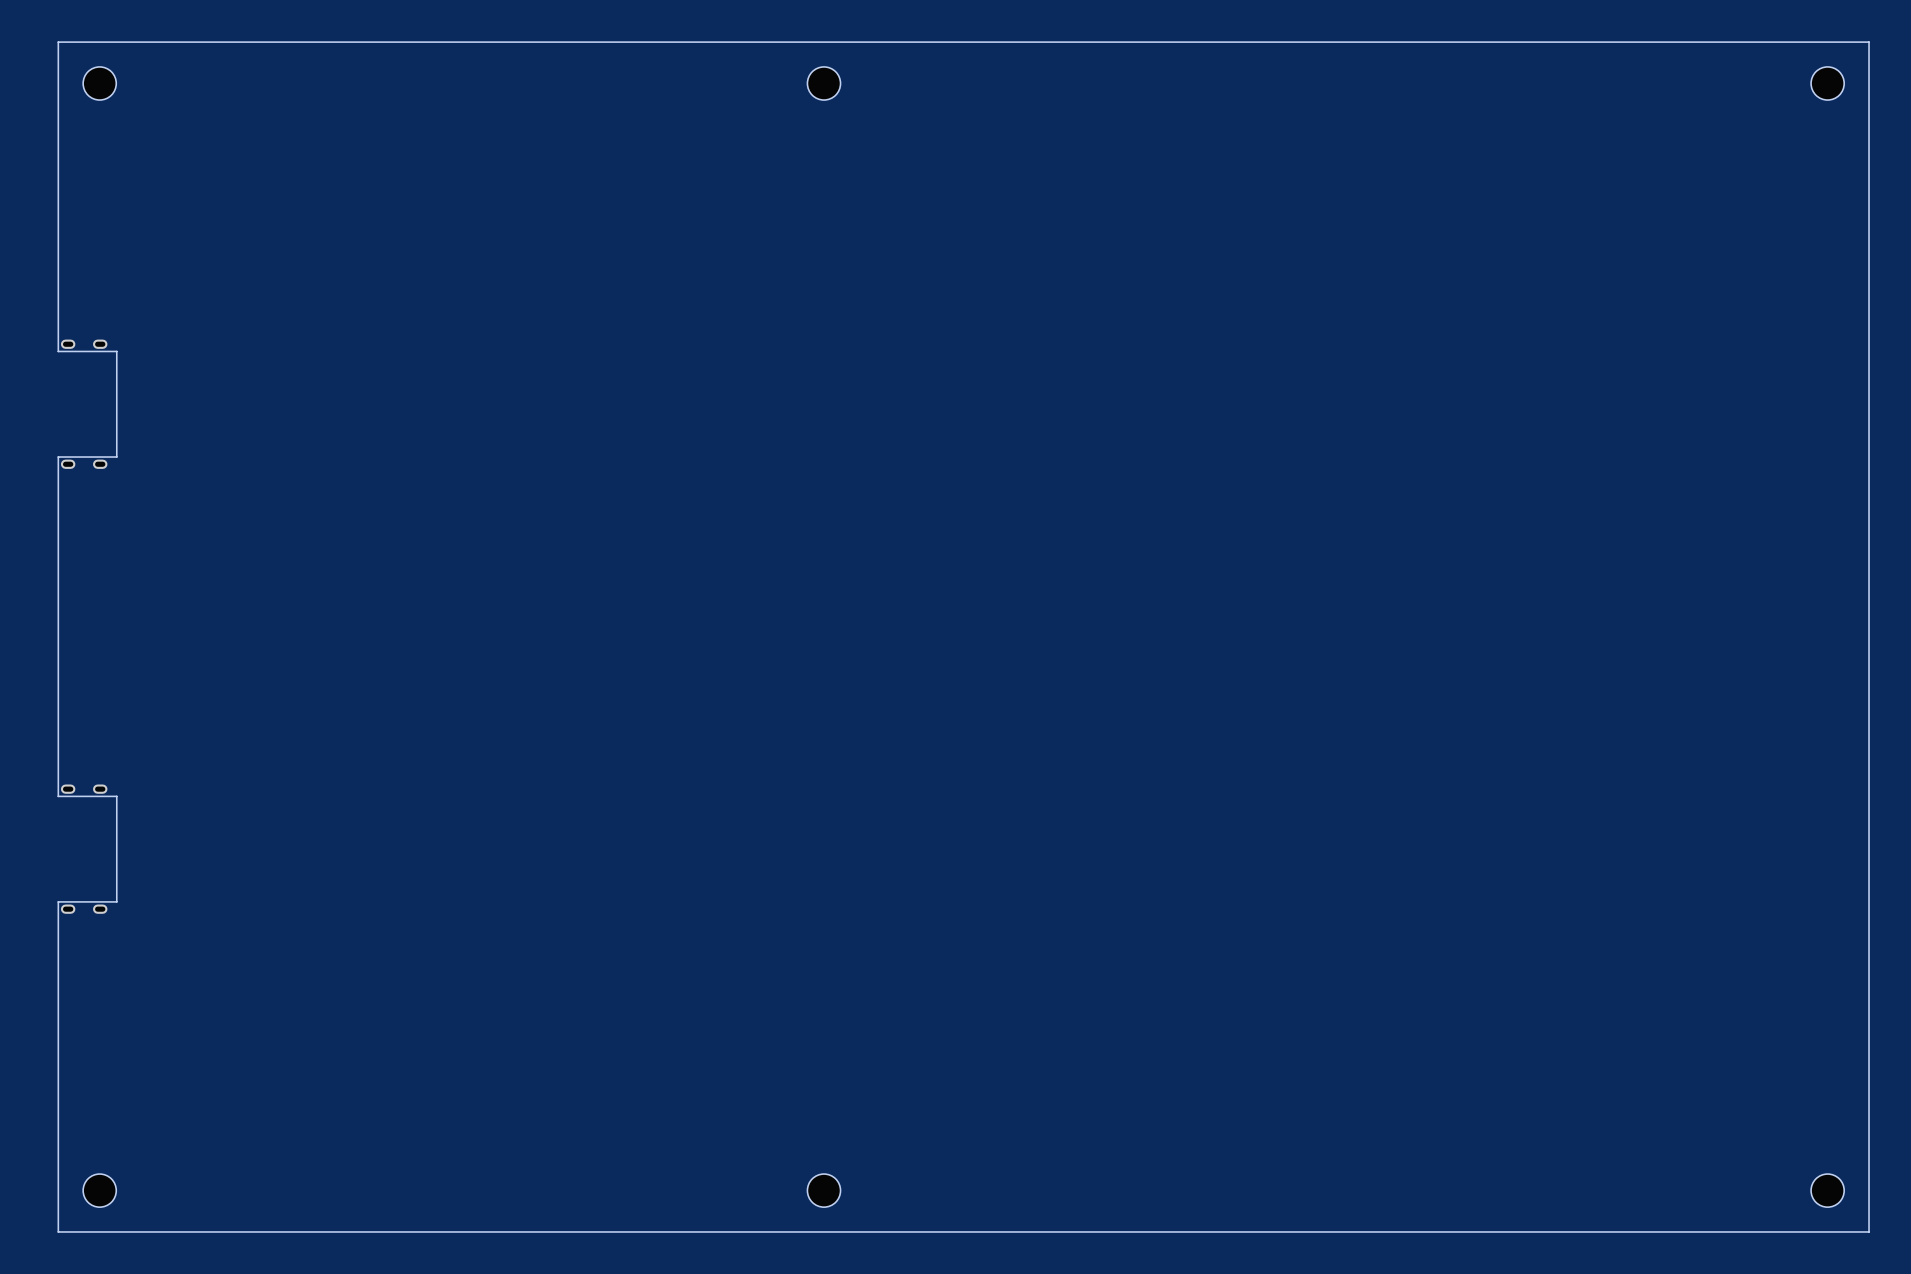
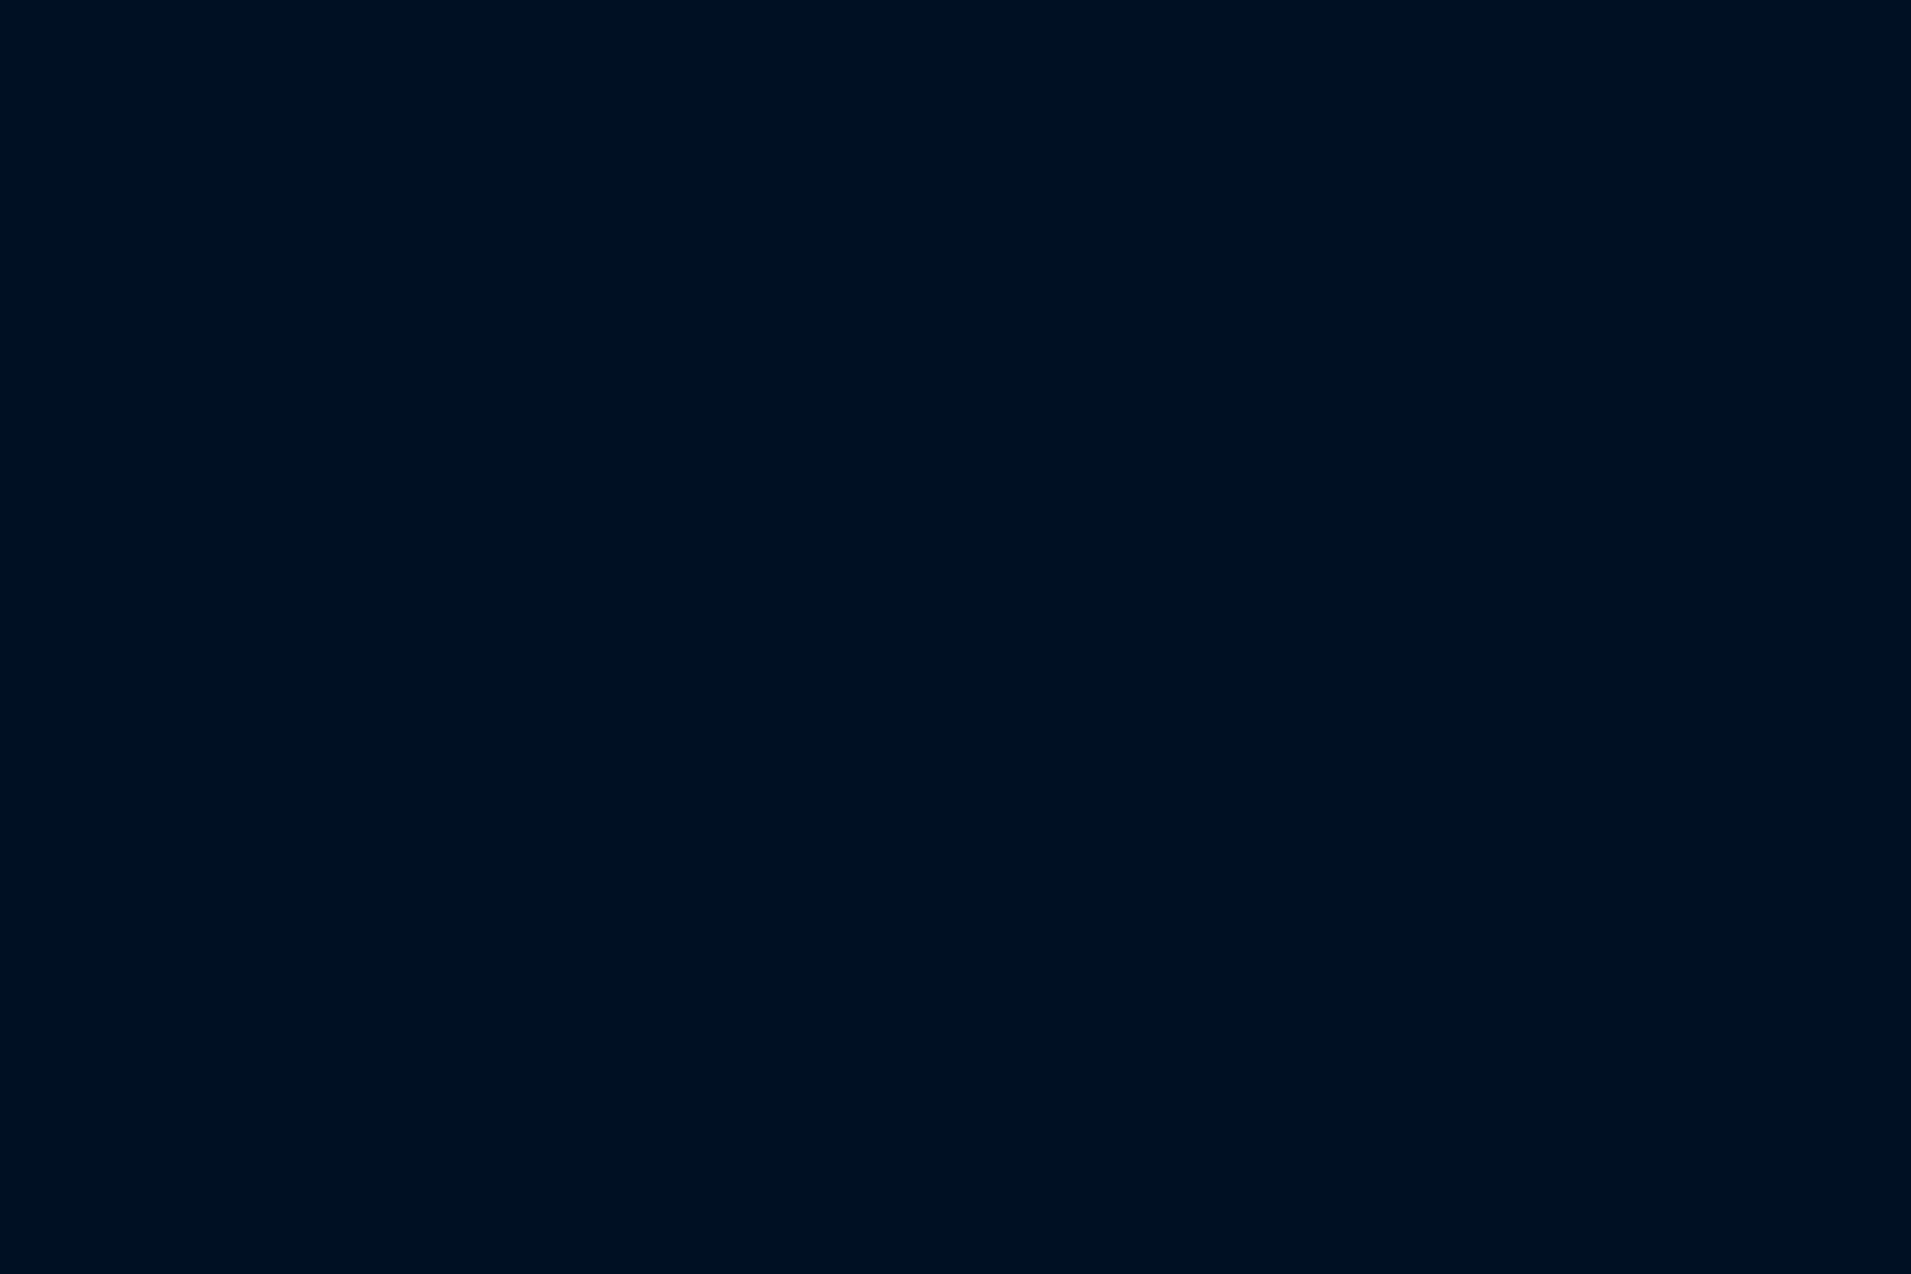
part: (99, 83) -> none
part: (823, 83) -> none
part: (1827, 83) -> none
board edge: (58, 351) (58, 42) (1869, 42) (1869, 1231) (58, 1231) (58, 901) -> none
part: (87, 404) -> none
board edge: (58, 457) (58, 796) -> none
part: (87, 849) -> none
part: (99, 1190) -> none
part: (823, 1190) -> none
part: (1827, 1190) -> none

